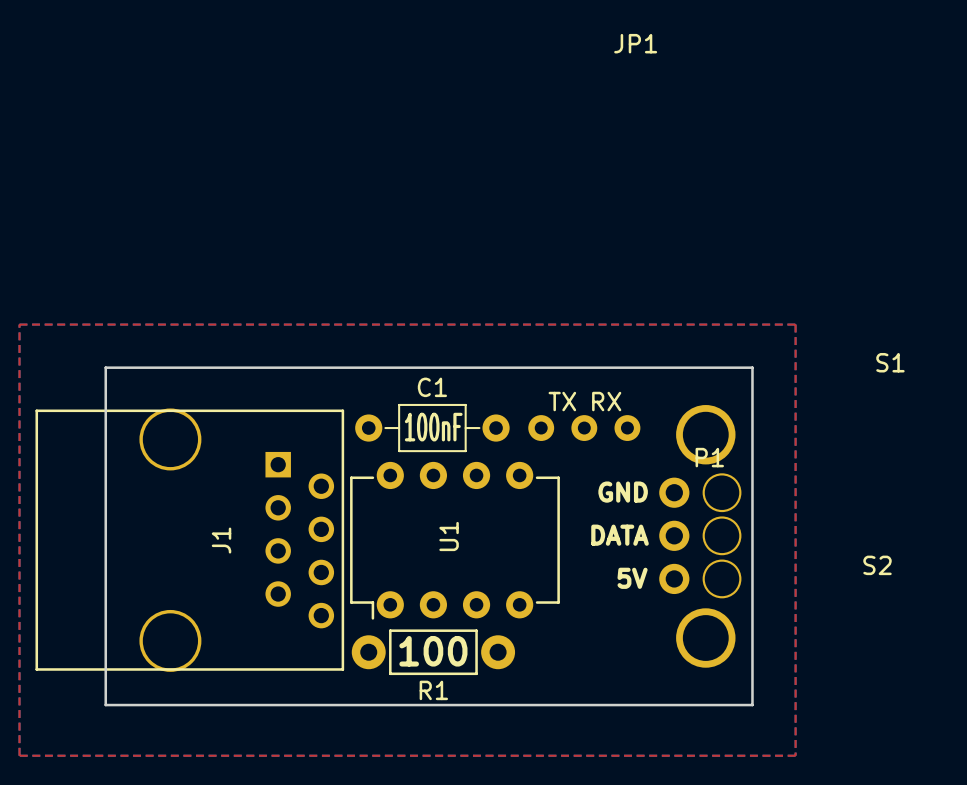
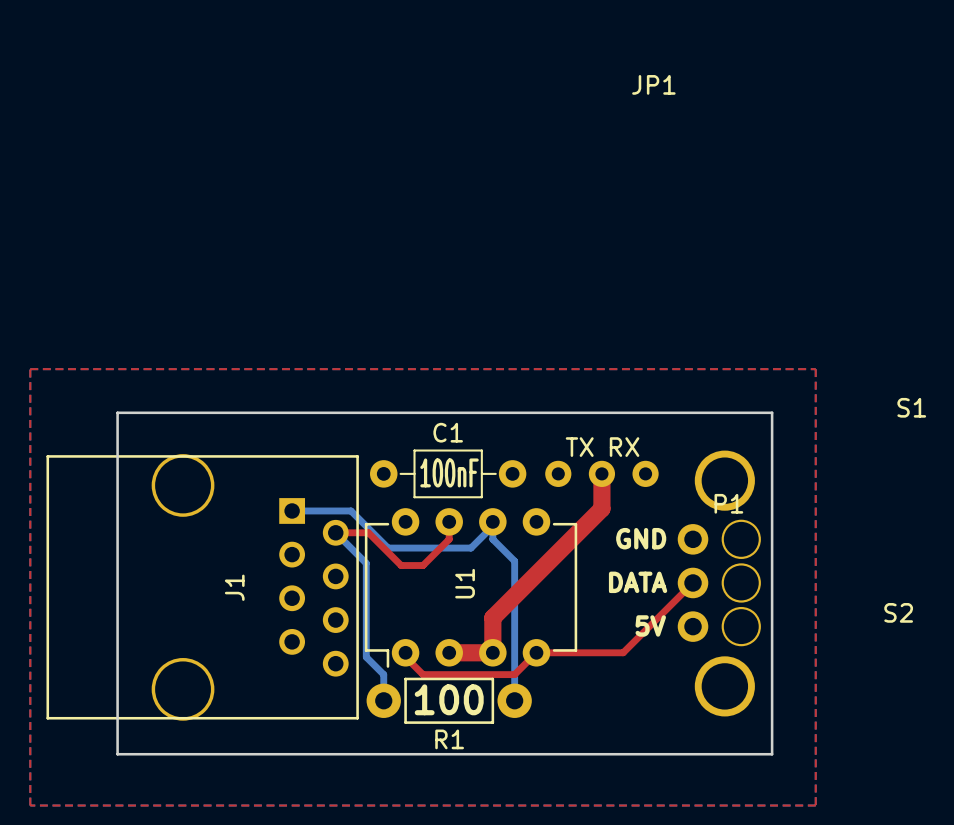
top track: none -> (601, 473) (601, 508) (492, 617) (492, 652) (449, 652)
bottom track: none -> (292, 510) (351, 510) (388, 548) (471, 548) (492, 526)
top track: none -> (449, 521) (449, 539) (423, 565) (401, 565) (368, 532) (335, 532)
bottom track: none -> (492, 521) (492, 539) (514, 561) (514, 700)
bottom track: none -> (335, 532) (366, 563) (366, 657) (383, 674) (383, 700)
top track: none -> (693, 582) (623, 652) (536, 652) (514, 674) (423, 674) (405, 657) (405, 652)

